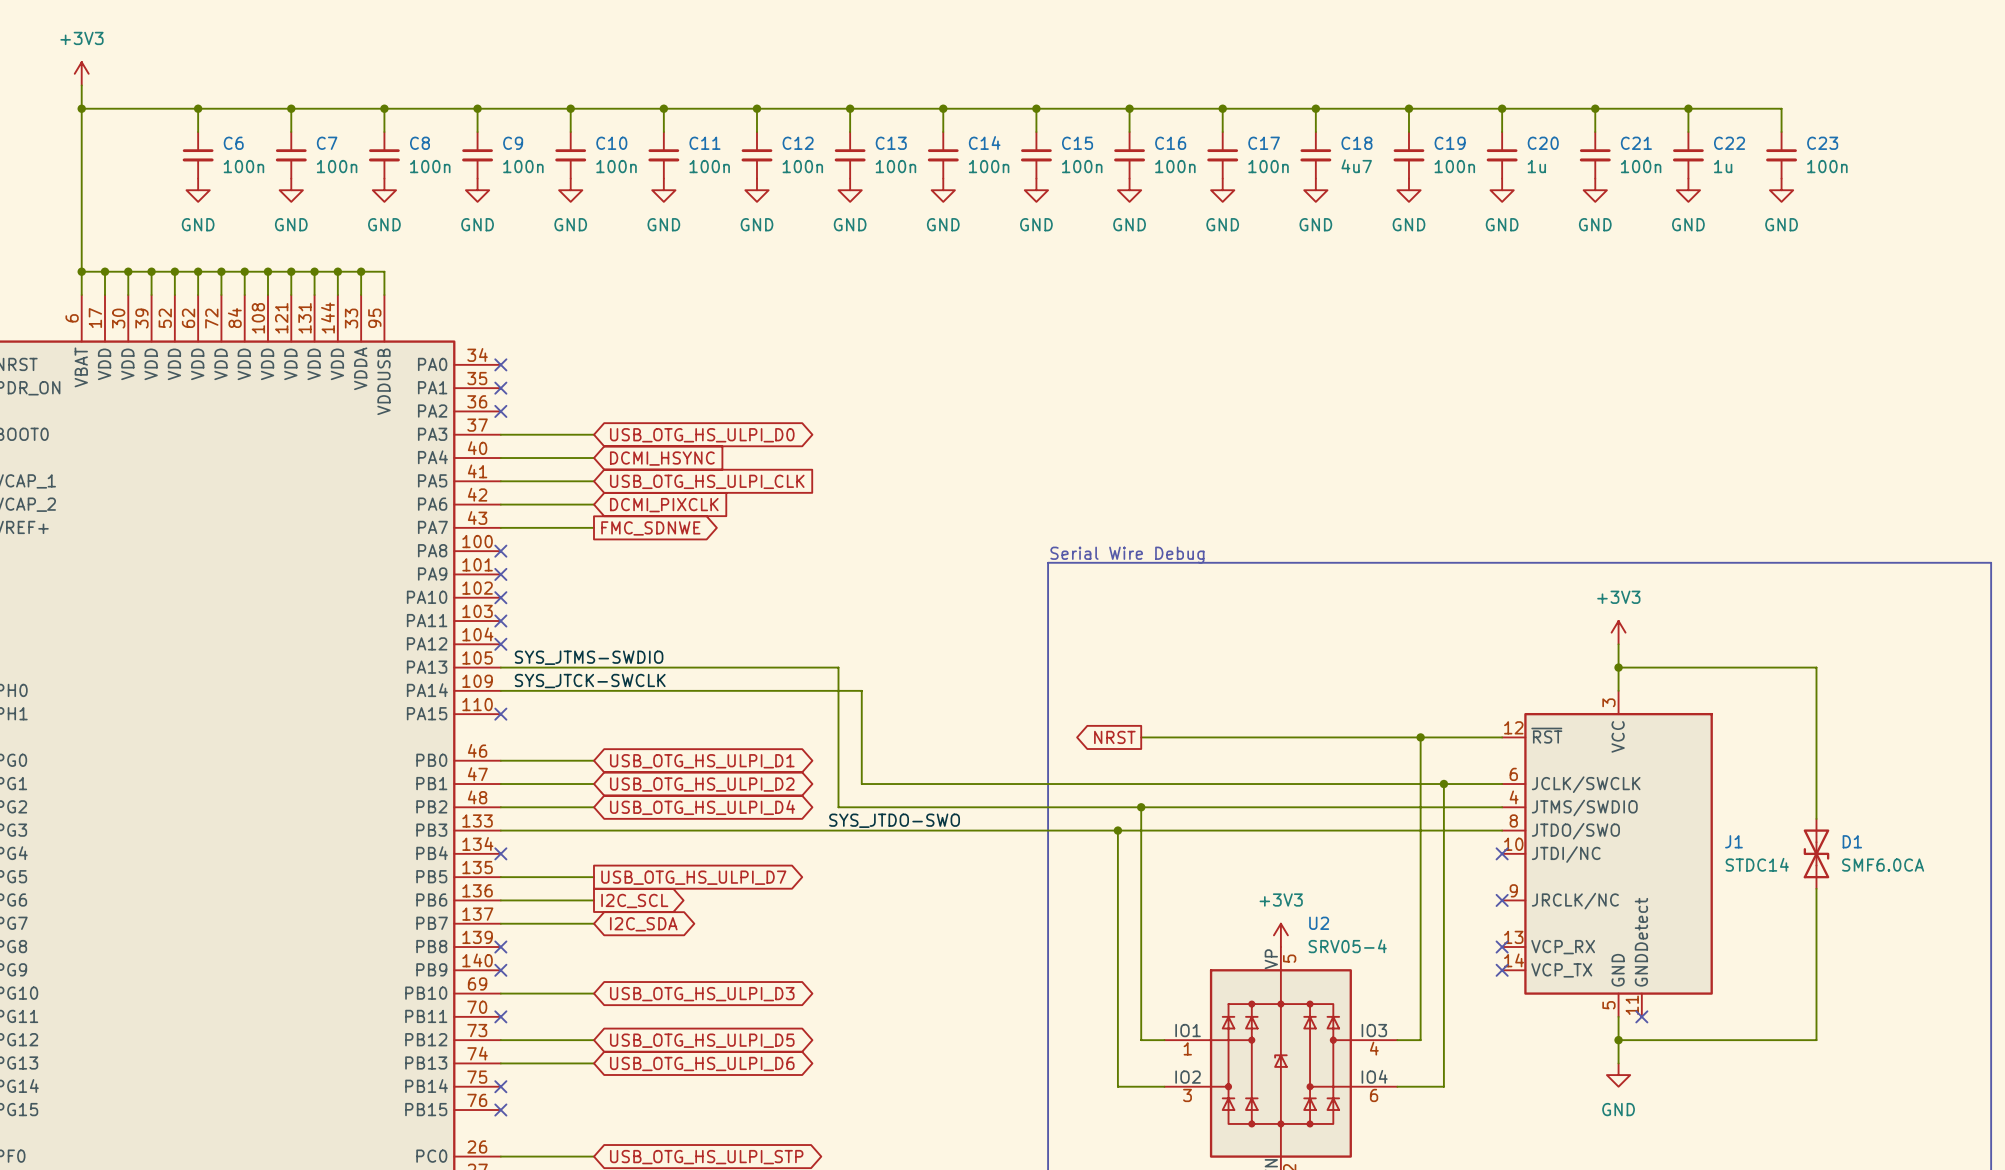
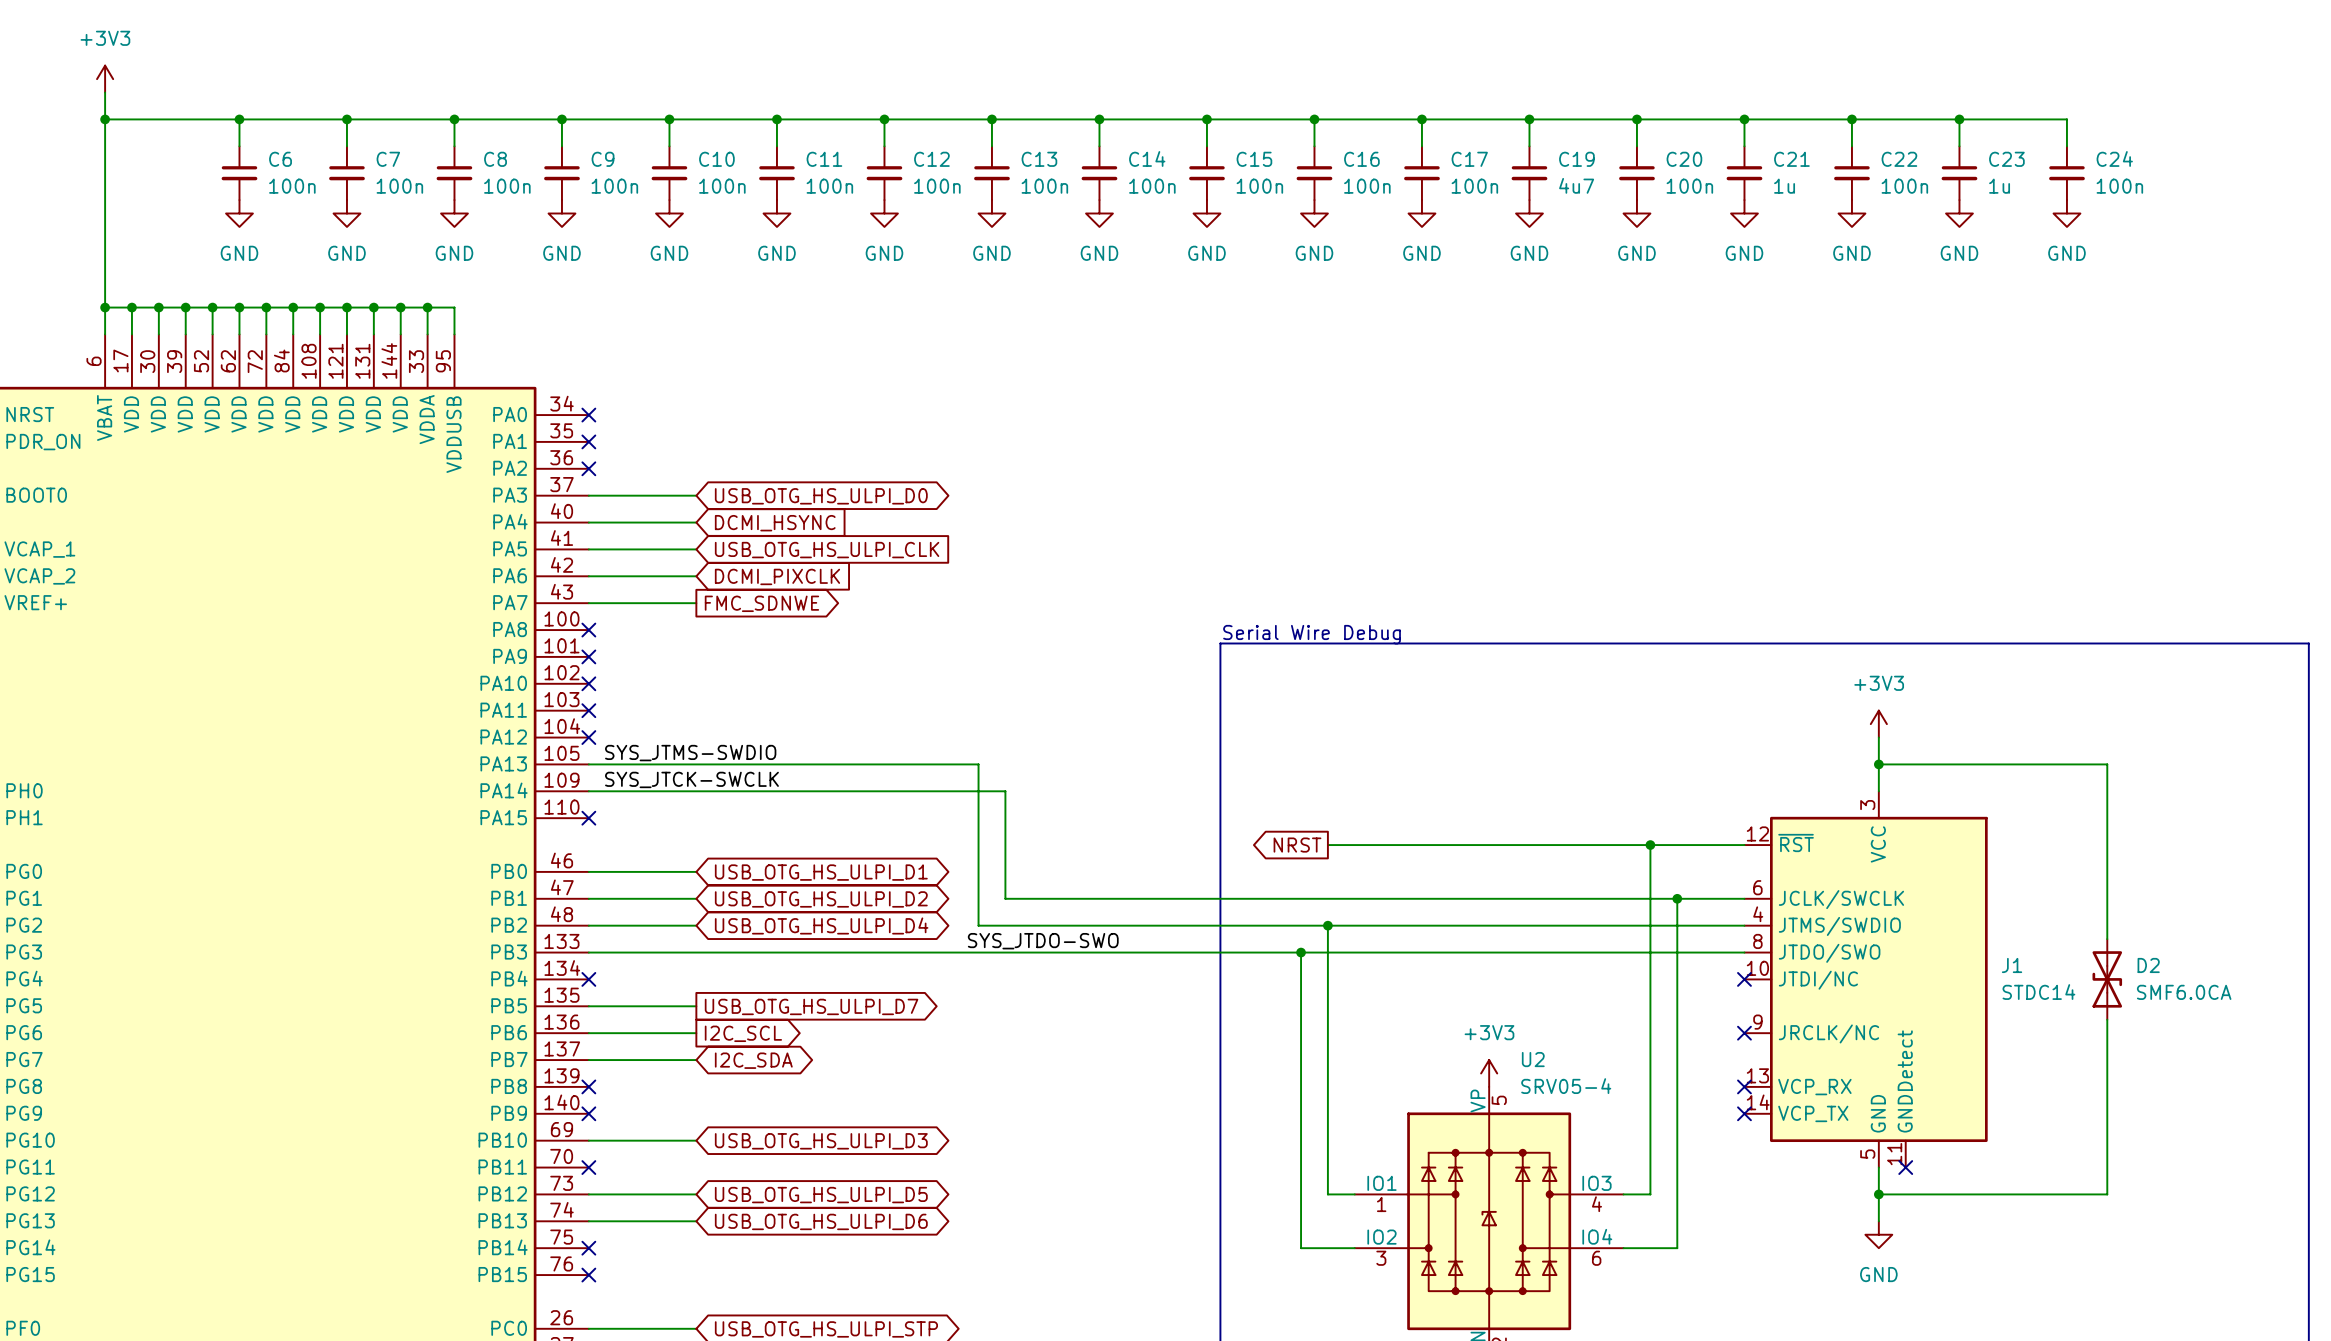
C18 name: C18 (1356, 143) -> C19 (1576, 159)
C19 name: C19 (1450, 143) -> C20 (1684, 159)
C20 name: C20 (1543, 143) -> C21 (1791, 159)
C21 name: C21 (1636, 143) -> C22 (1899, 159)
C22 name: C22 (1729, 143) -> C23 (2006, 159)
C23 name: C23 (1822, 143) -> C24 (2114, 158)
D1 name: D1 (1852, 841) -> D2 (2148, 965)

